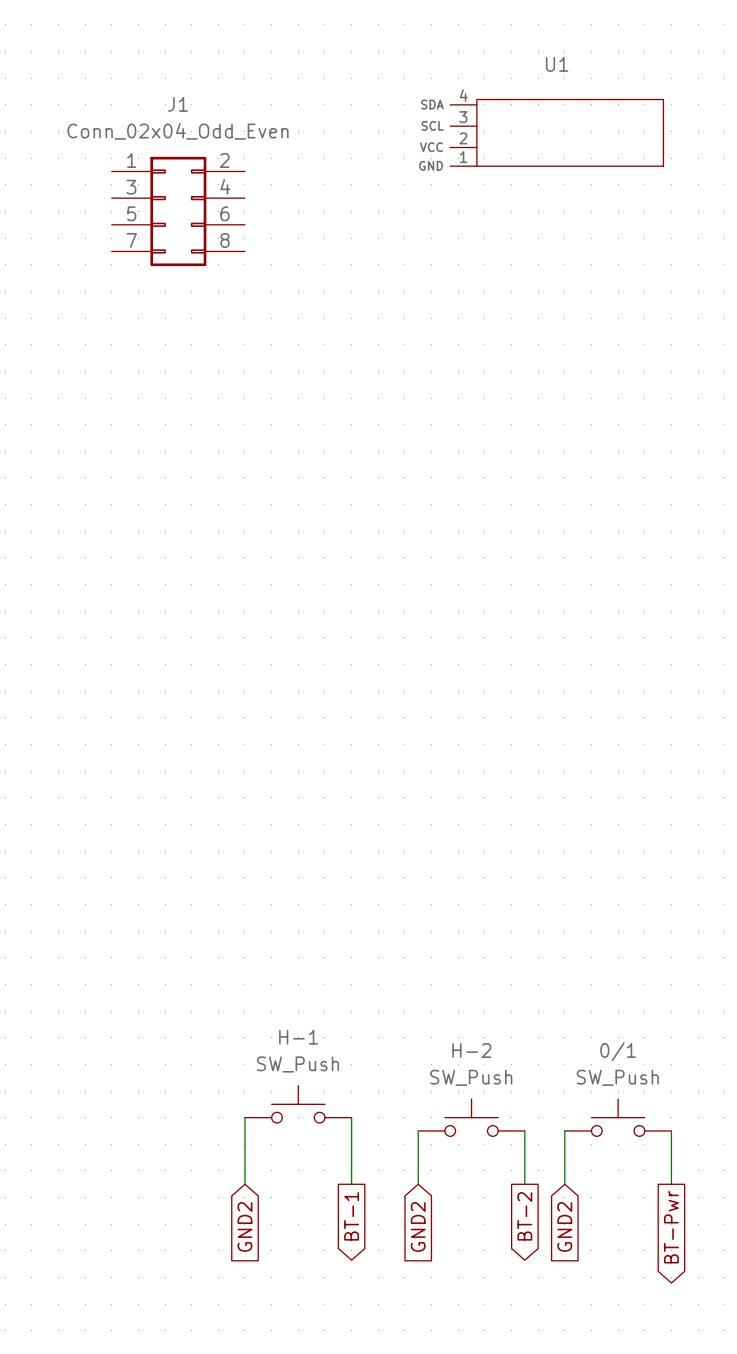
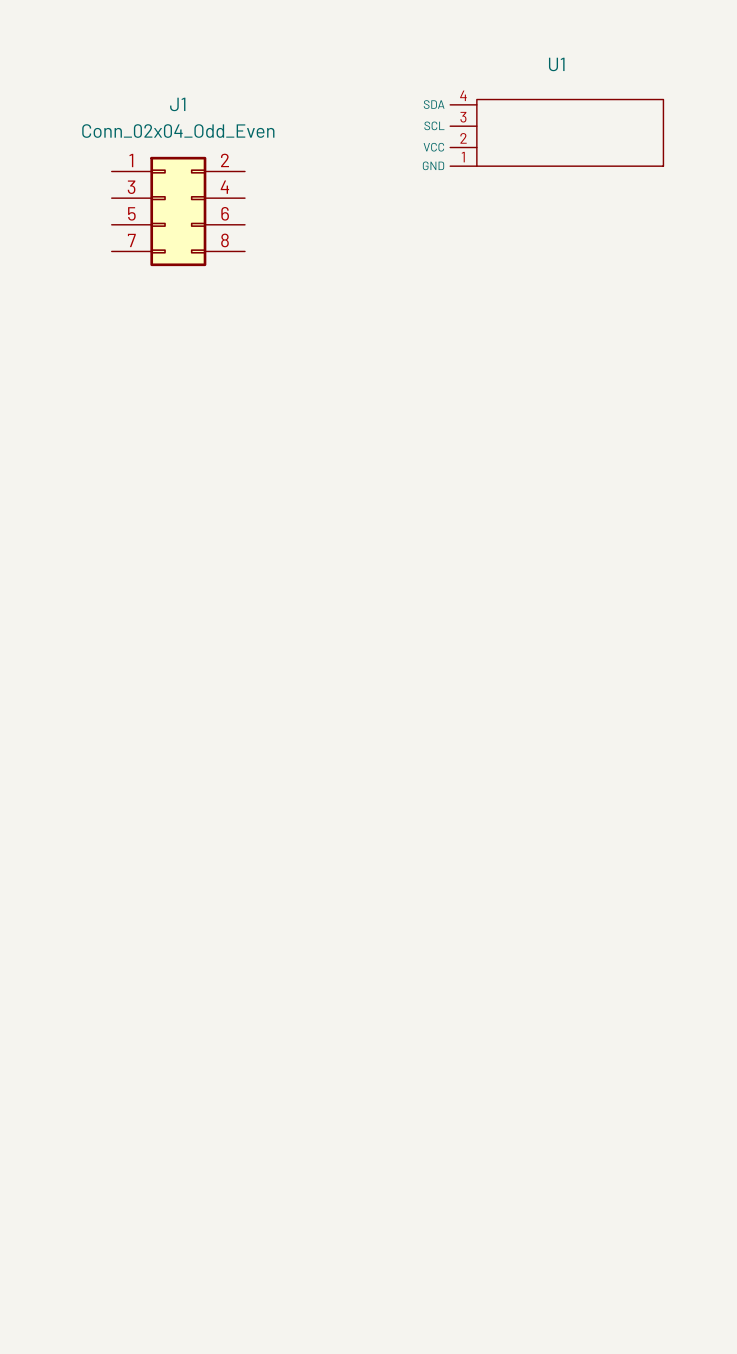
H-1: SW_Push (298, 1104) -> none
wire: (244, 1117) (244, 1184) -> none
wire: (351, 1117) (351, 1184) -> none
H-2: SW_Push (471, 1117) -> none
0/1: SW_Push (618, 1117) -> none
wire: (418, 1130) (418, 1184) -> none
wire: (524, 1130) (524, 1184) -> none
wire: (564, 1130) (564, 1184) -> none
wire: (671, 1130) (671, 1184) -> none
global label: BT-1 (351, 1216) -> none
global label: BT-2 (524, 1216) -> none
global label: GND2 (244, 1226) -> none
global label: GND2 (418, 1226) -> none
global label: GND2 (564, 1226) -> none
global label: BT-Pwr (671, 1227) -> none

